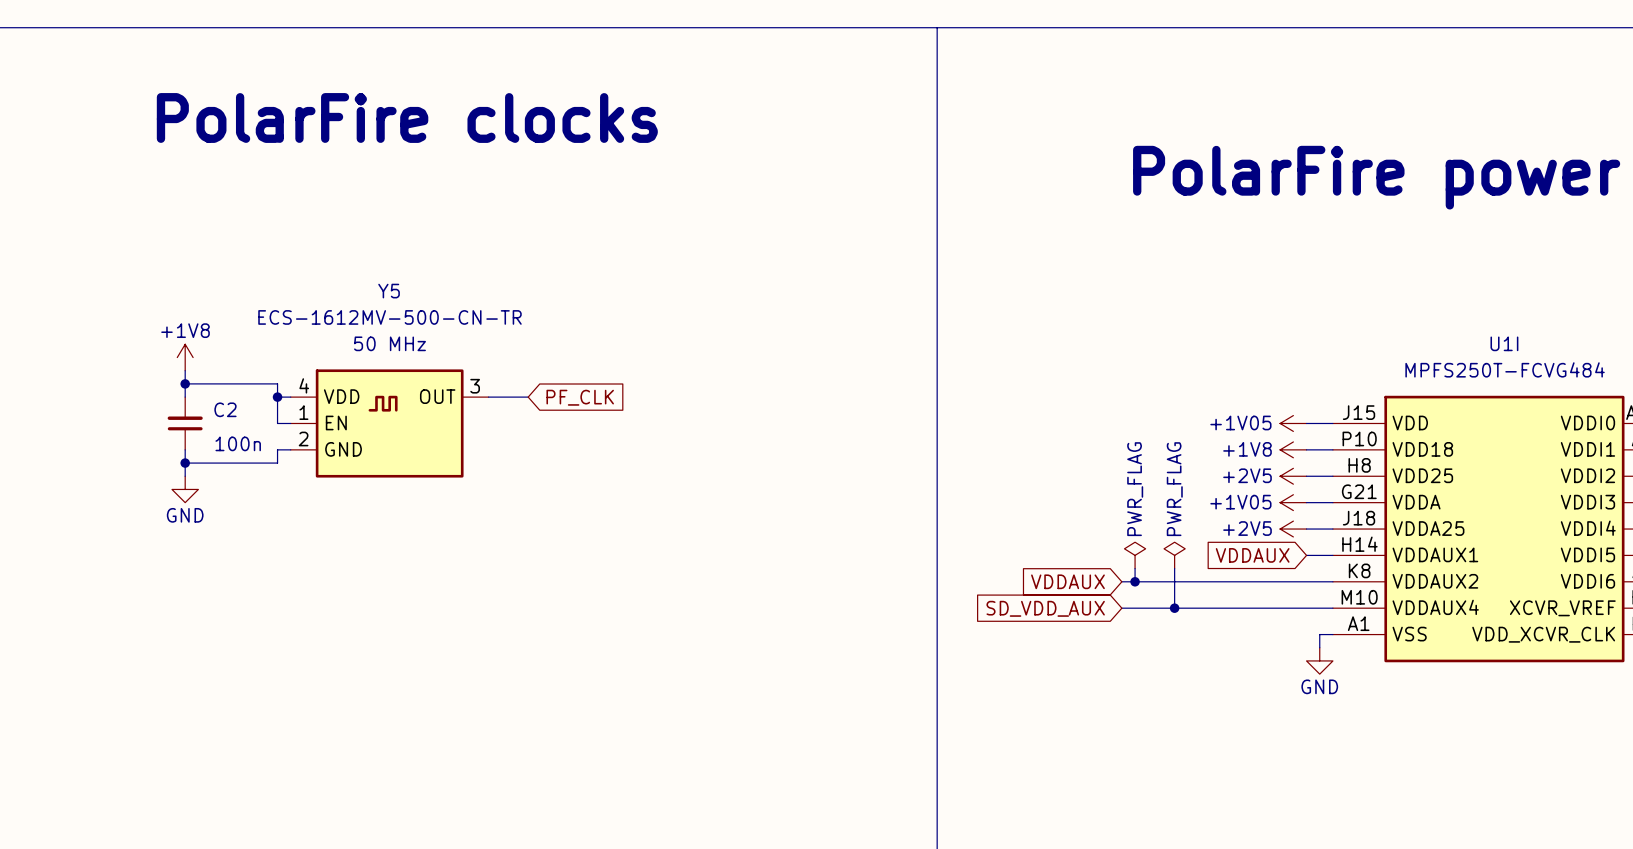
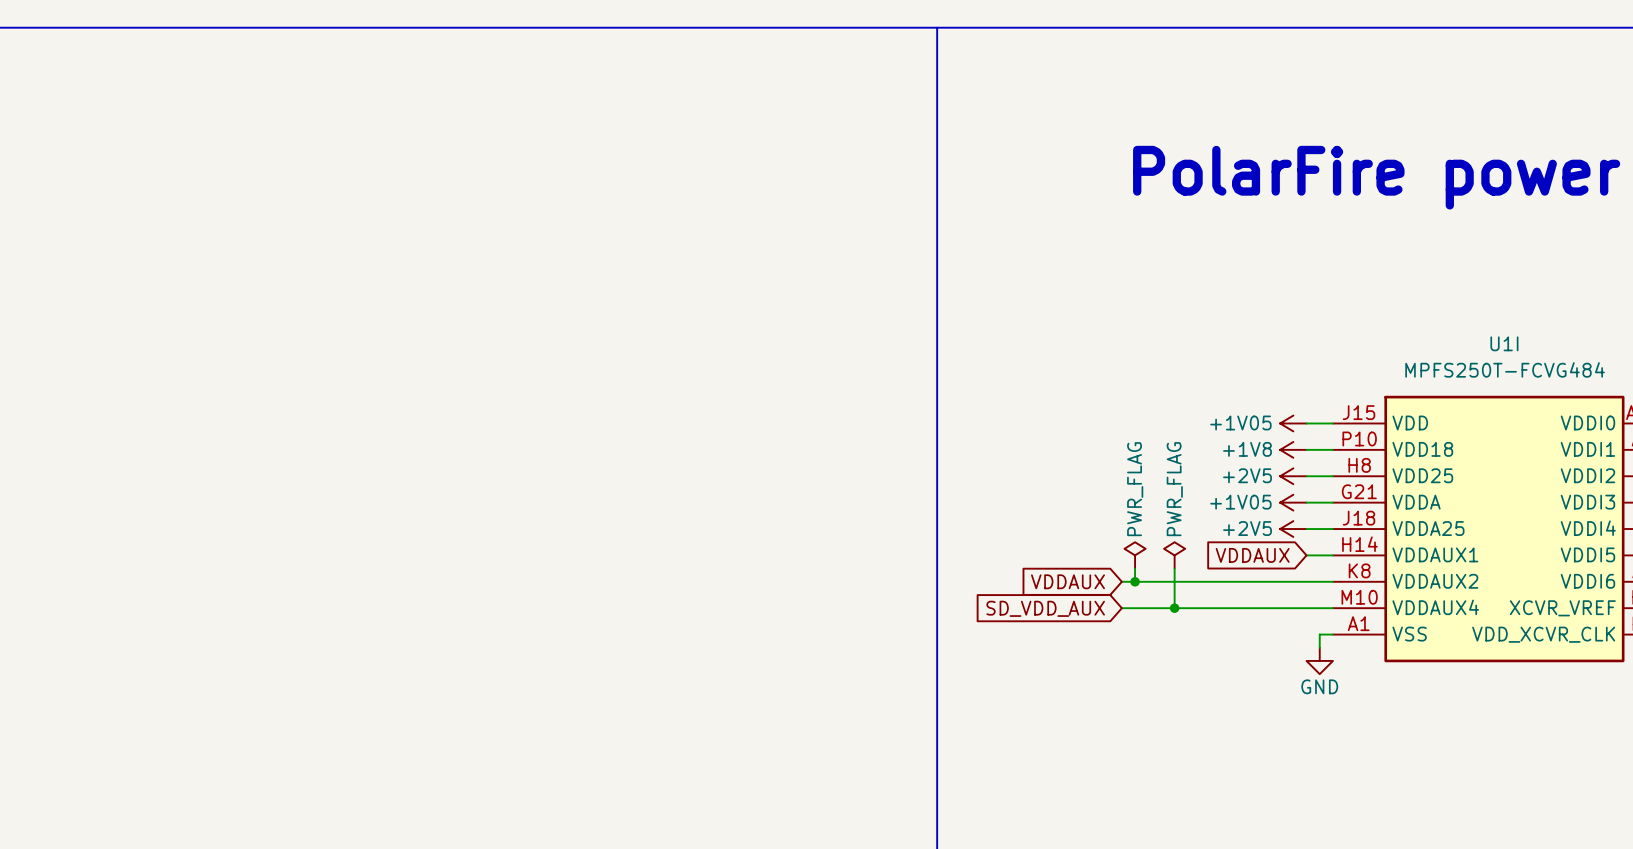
text: PolarFire clocks (407, 117) -> none
power symbol: +1V8 (185, 357) -> none
wire: (185, 370) (185, 397) -> none
wire: (185, 383) (277, 383) (277, 423) (290, 423) -> none
junction: (185, 383) -> none
wire: (277, 397) (290, 397) -> none
junction: (277, 397) -> none
wire: (488, 397) (528, 397) -> none
global label: PF_CLK (580, 397) -> none
C2: (185, 423) -> none
Y5: (389, 423) -> none
wire: (185, 449) (185, 476) -> none
wire: (290, 449) (277, 449) (277, 463) (185, 463) -> none
junction: (185, 463) -> none
power symbol: GND (185, 489) -> none

